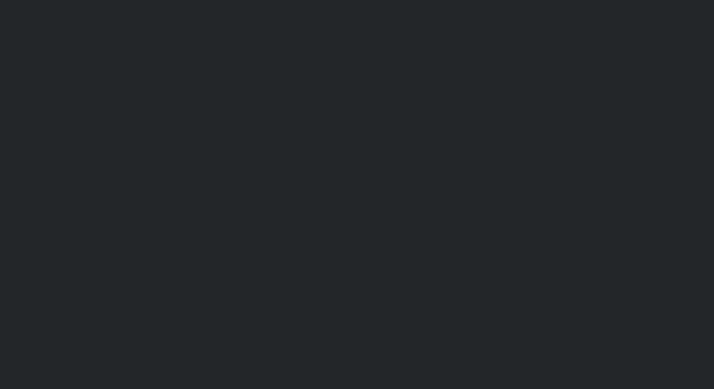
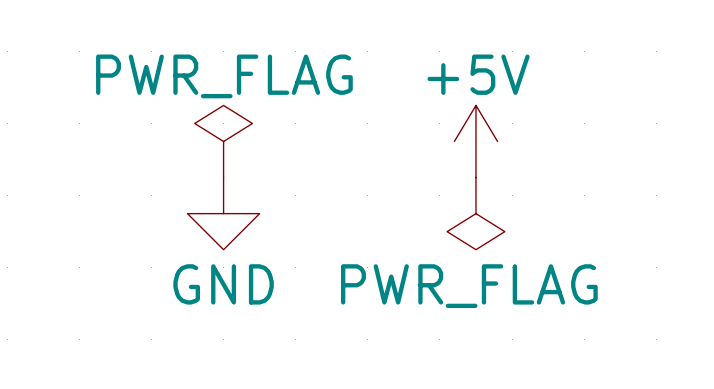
power symbol: none -> PWR_FLAG (223, 141)
power symbol: none -> +5V (475, 141)
power symbol: none -> GND (223, 213)
power symbol: none -> PWR_FLAG (475, 213)

